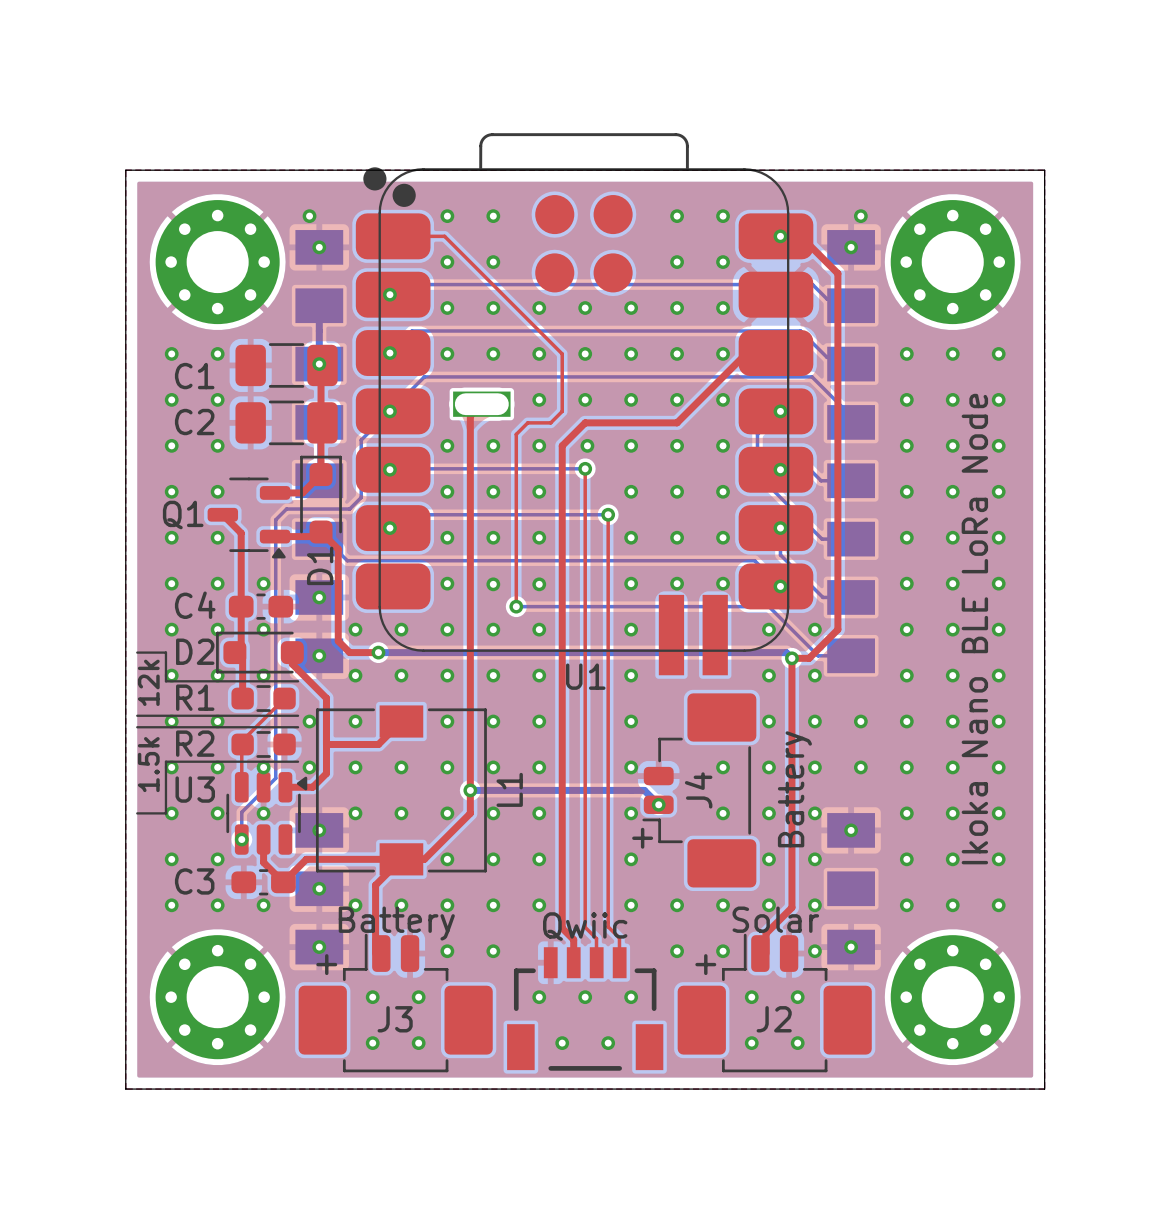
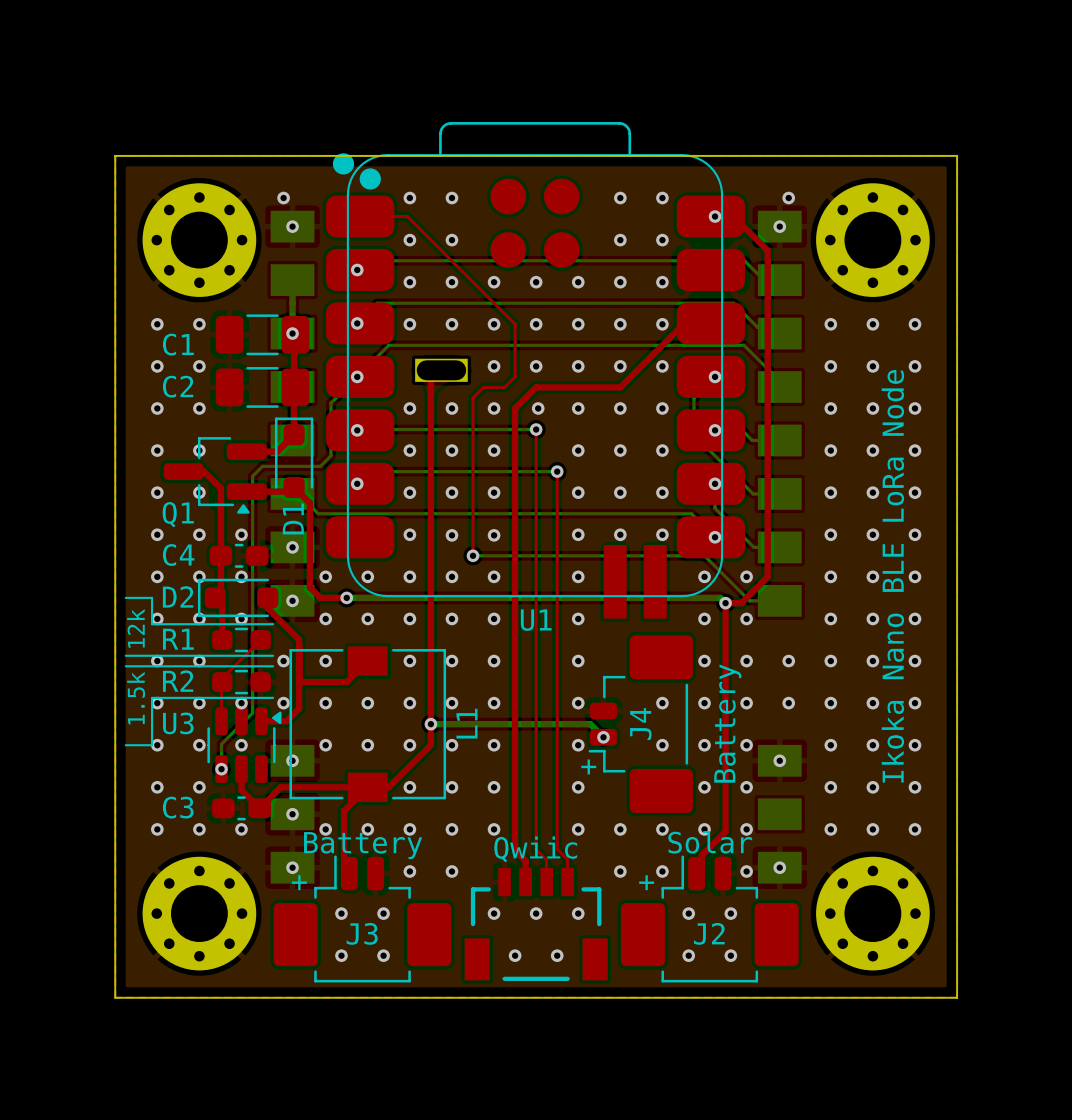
Q1 footprint: [207, 477, 291, 559] -> [163, 437, 267, 514]
Q1 name position: Q1 (183, 515) -> Q1 (178, 514)

